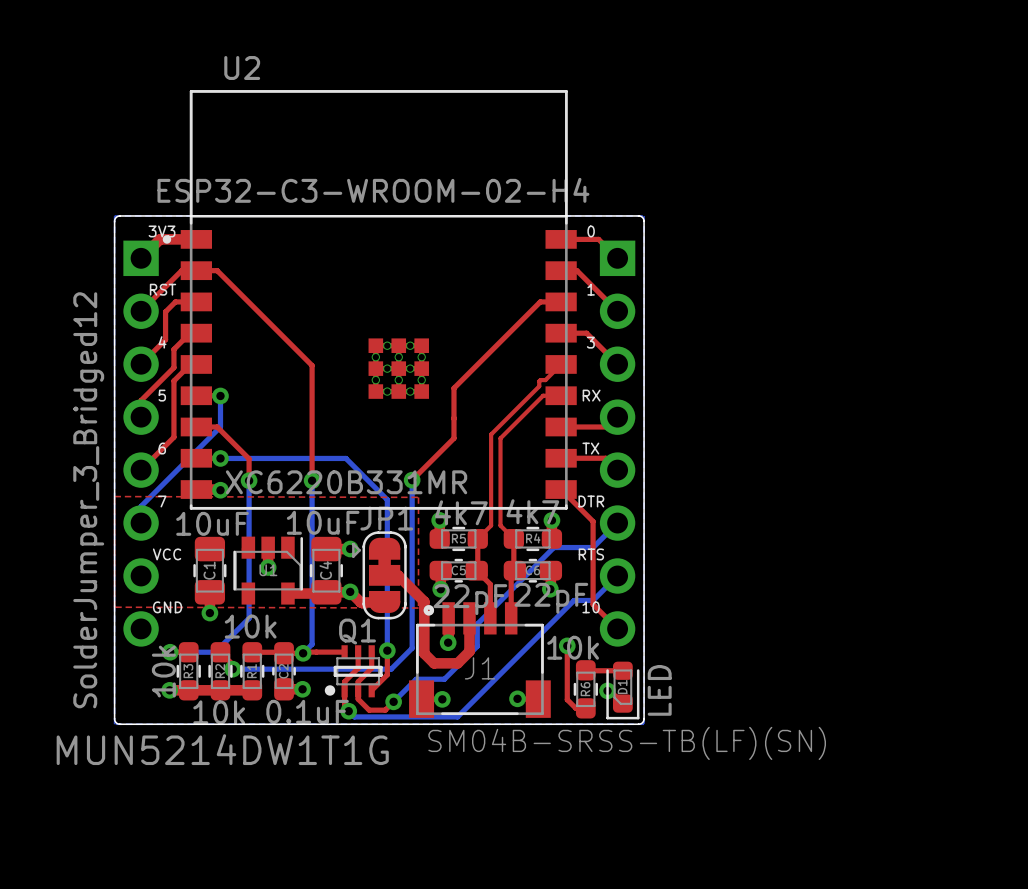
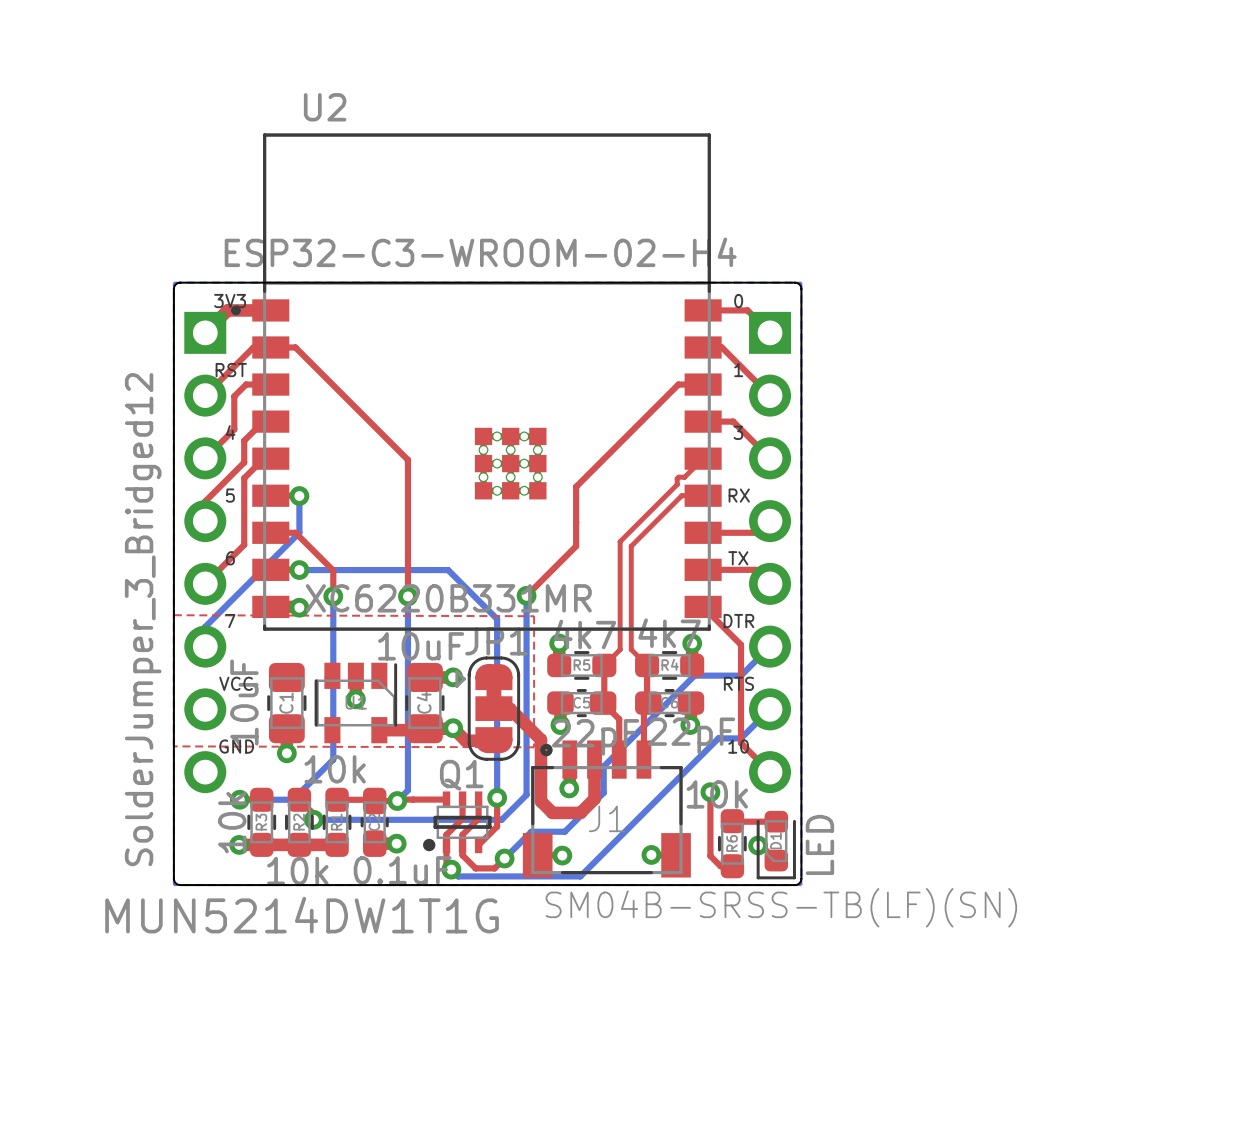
C1 value rotation: 0° (212, 523) -> 90° counterclockwise (244, 702)

